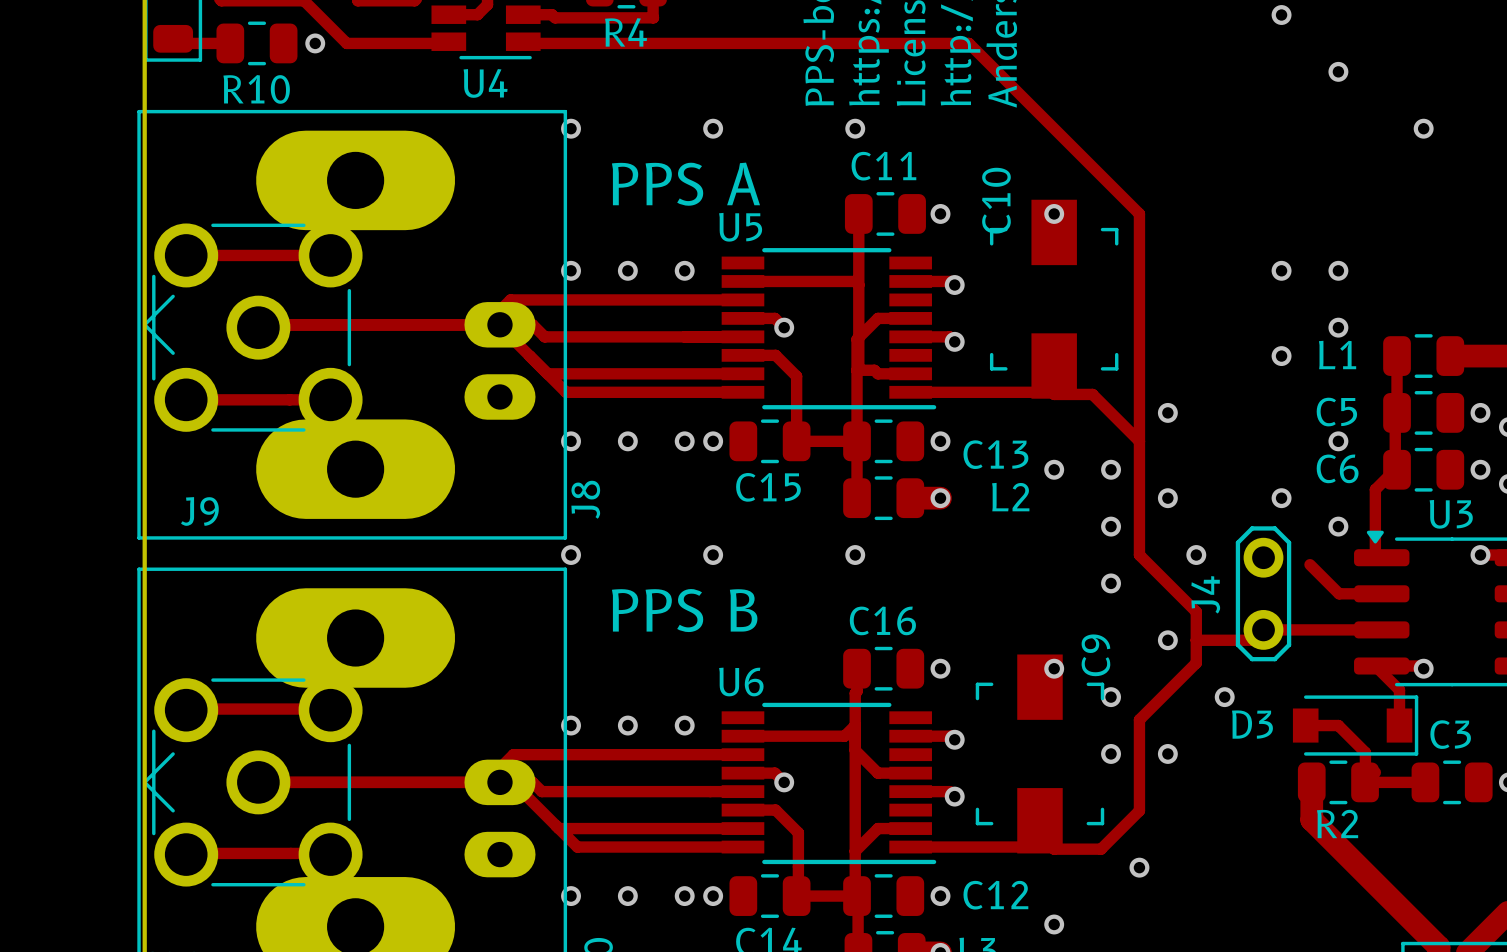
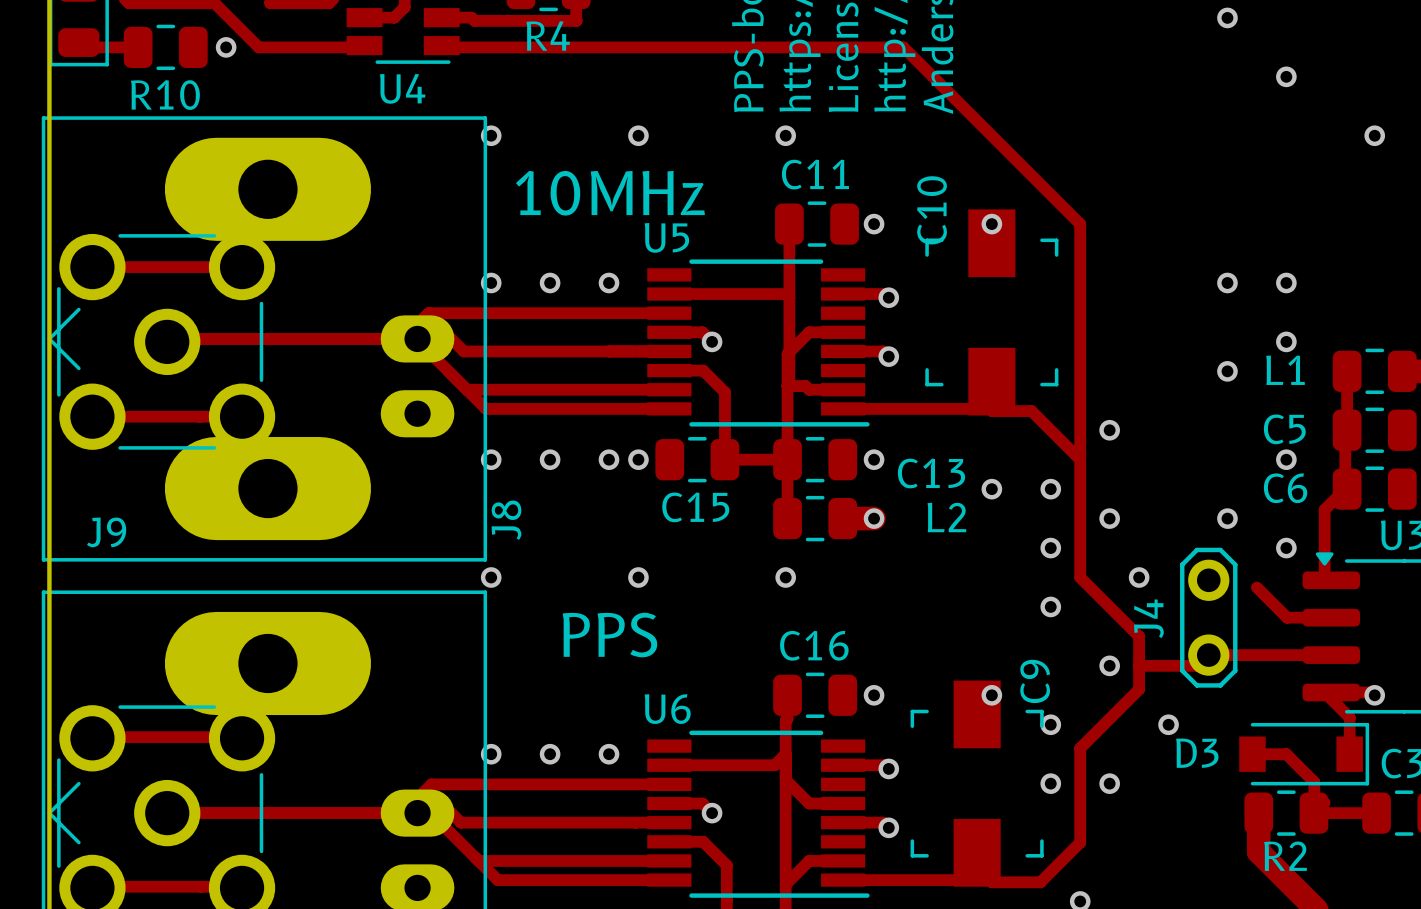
text: PPS A (685, 184) -> 10MHz (610, 193)
text: PPS B (684, 610) -> PPS (609, 635)

